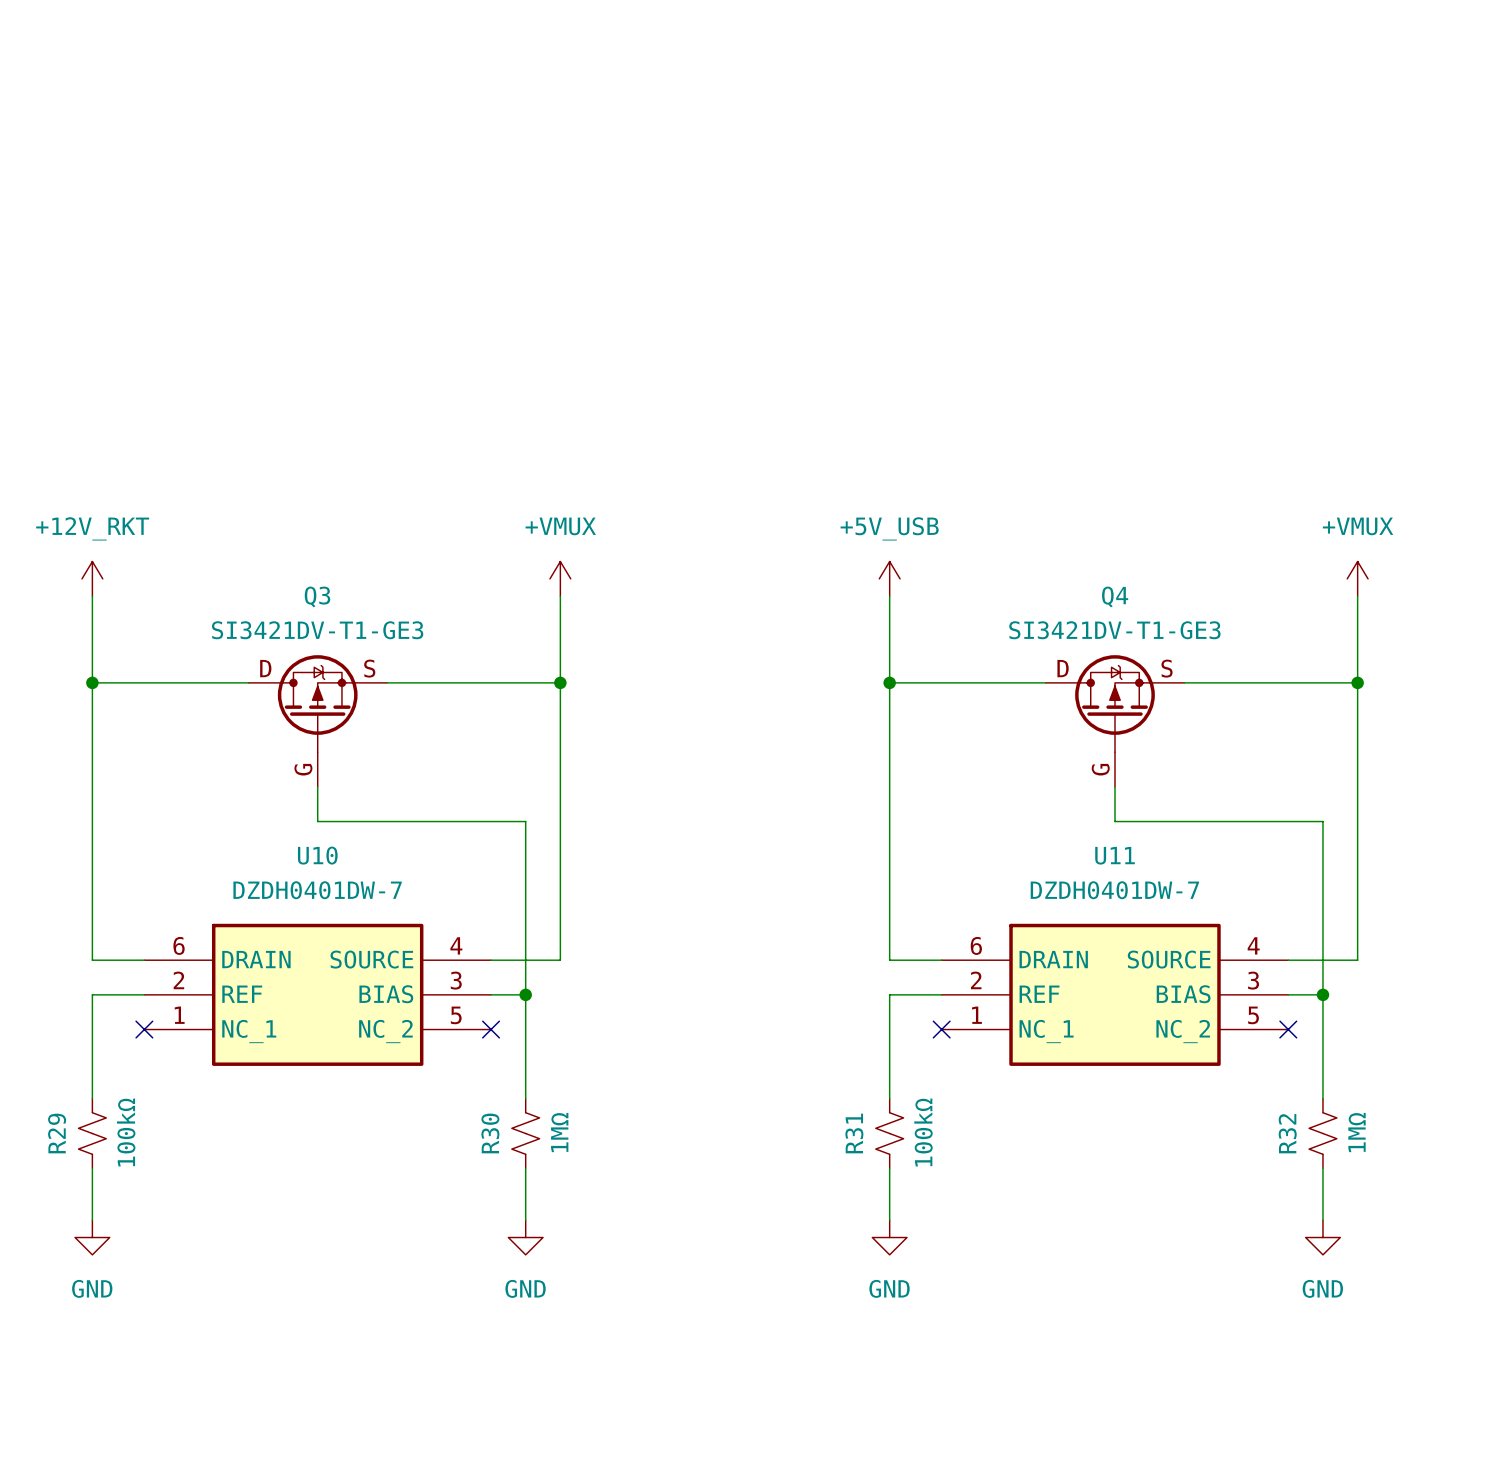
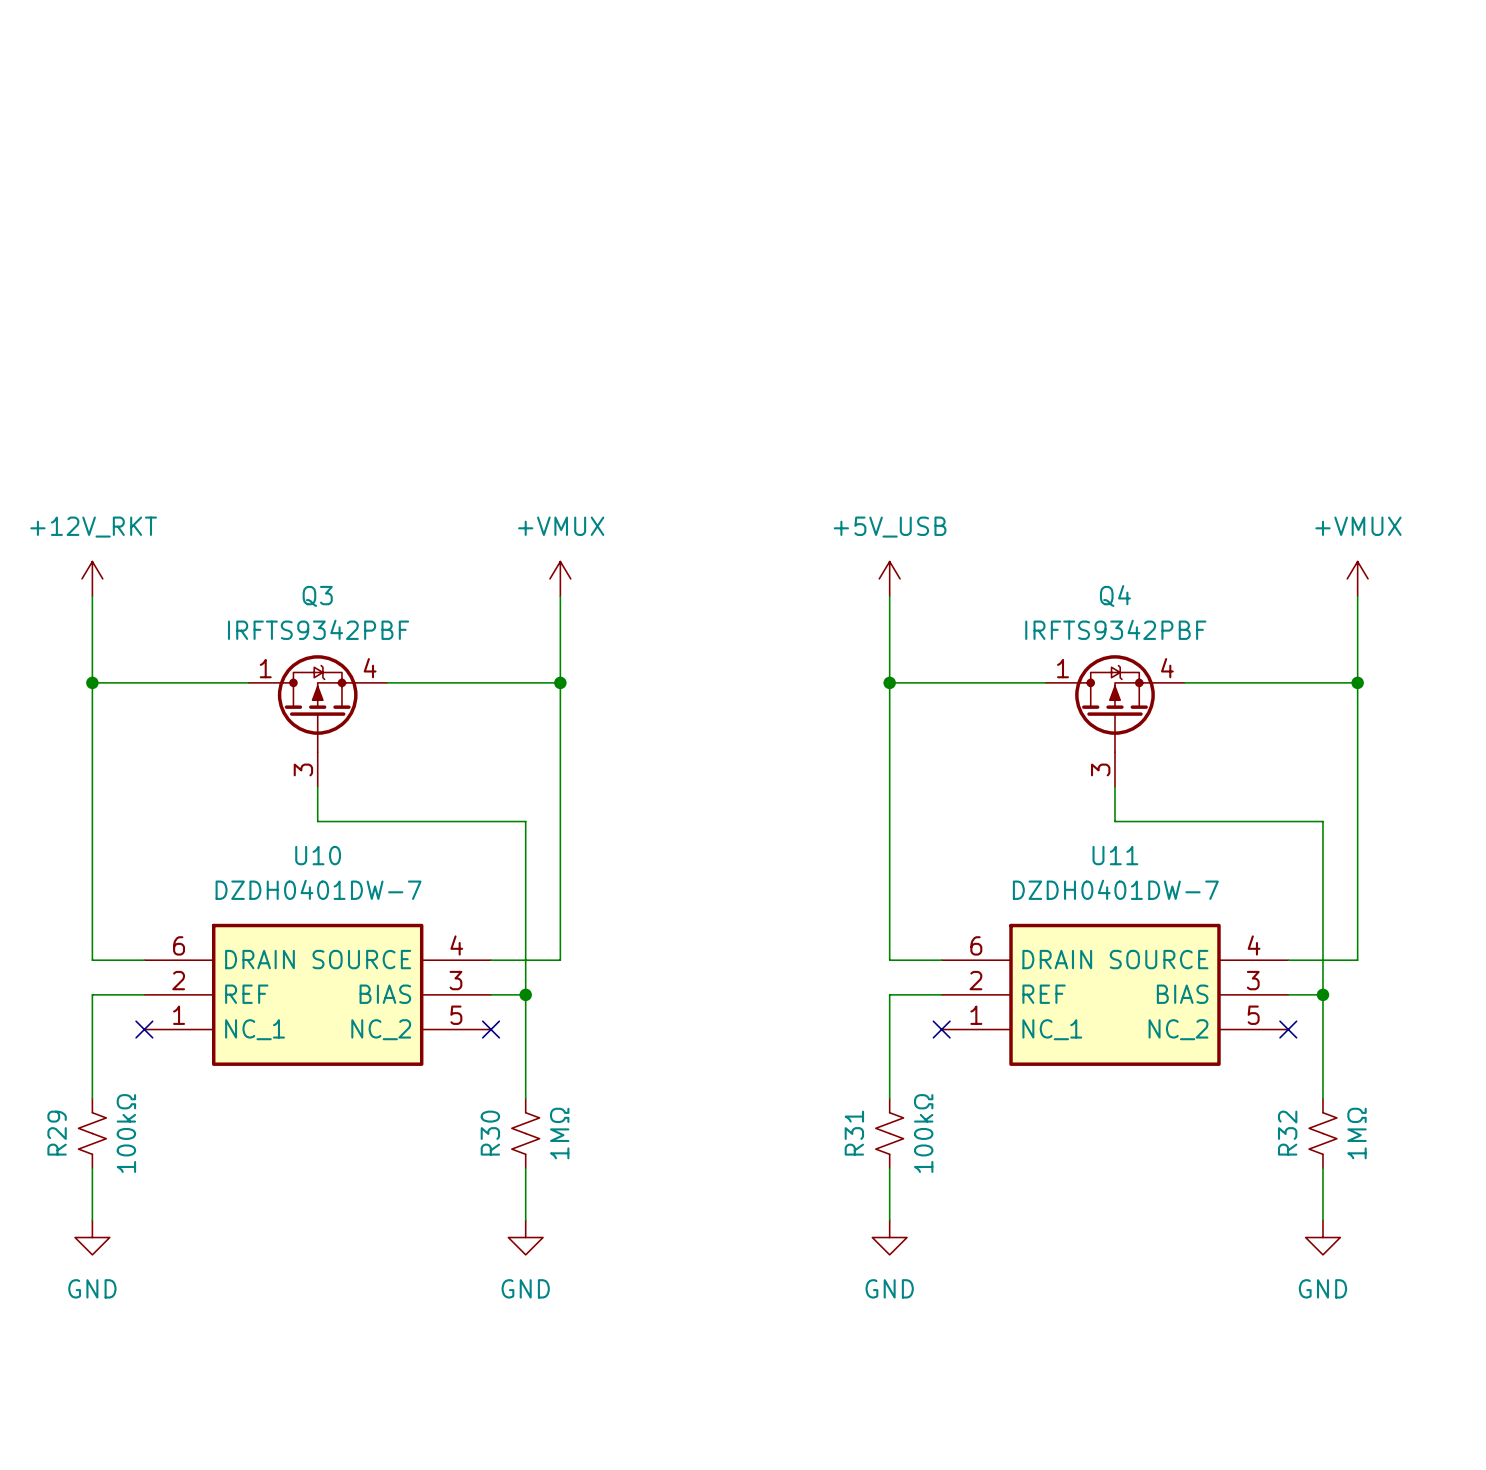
Q3 value: SI3421DV-T1-GE3 (317, 630) -> IRFTS9342PBF (318, 629)
Q4 value: SI3421DV-T1-GE3 (1114, 630) -> IRFTS9342PBF (1115, 629)
Q3 pin number: D (265, 668) -> 1 (265, 668)
Q3 pin number: S (369, 668) -> 4 (370, 668)
Q4 pin number: D (1063, 668) -> 1 (1063, 668)
Q4 pin number: S (1167, 668) -> 4 (1167, 668)
Q3 pin number: G (303, 769) -> 3 (303, 769)
Q4 pin number: G (1100, 769) -> 3 (1100, 769)

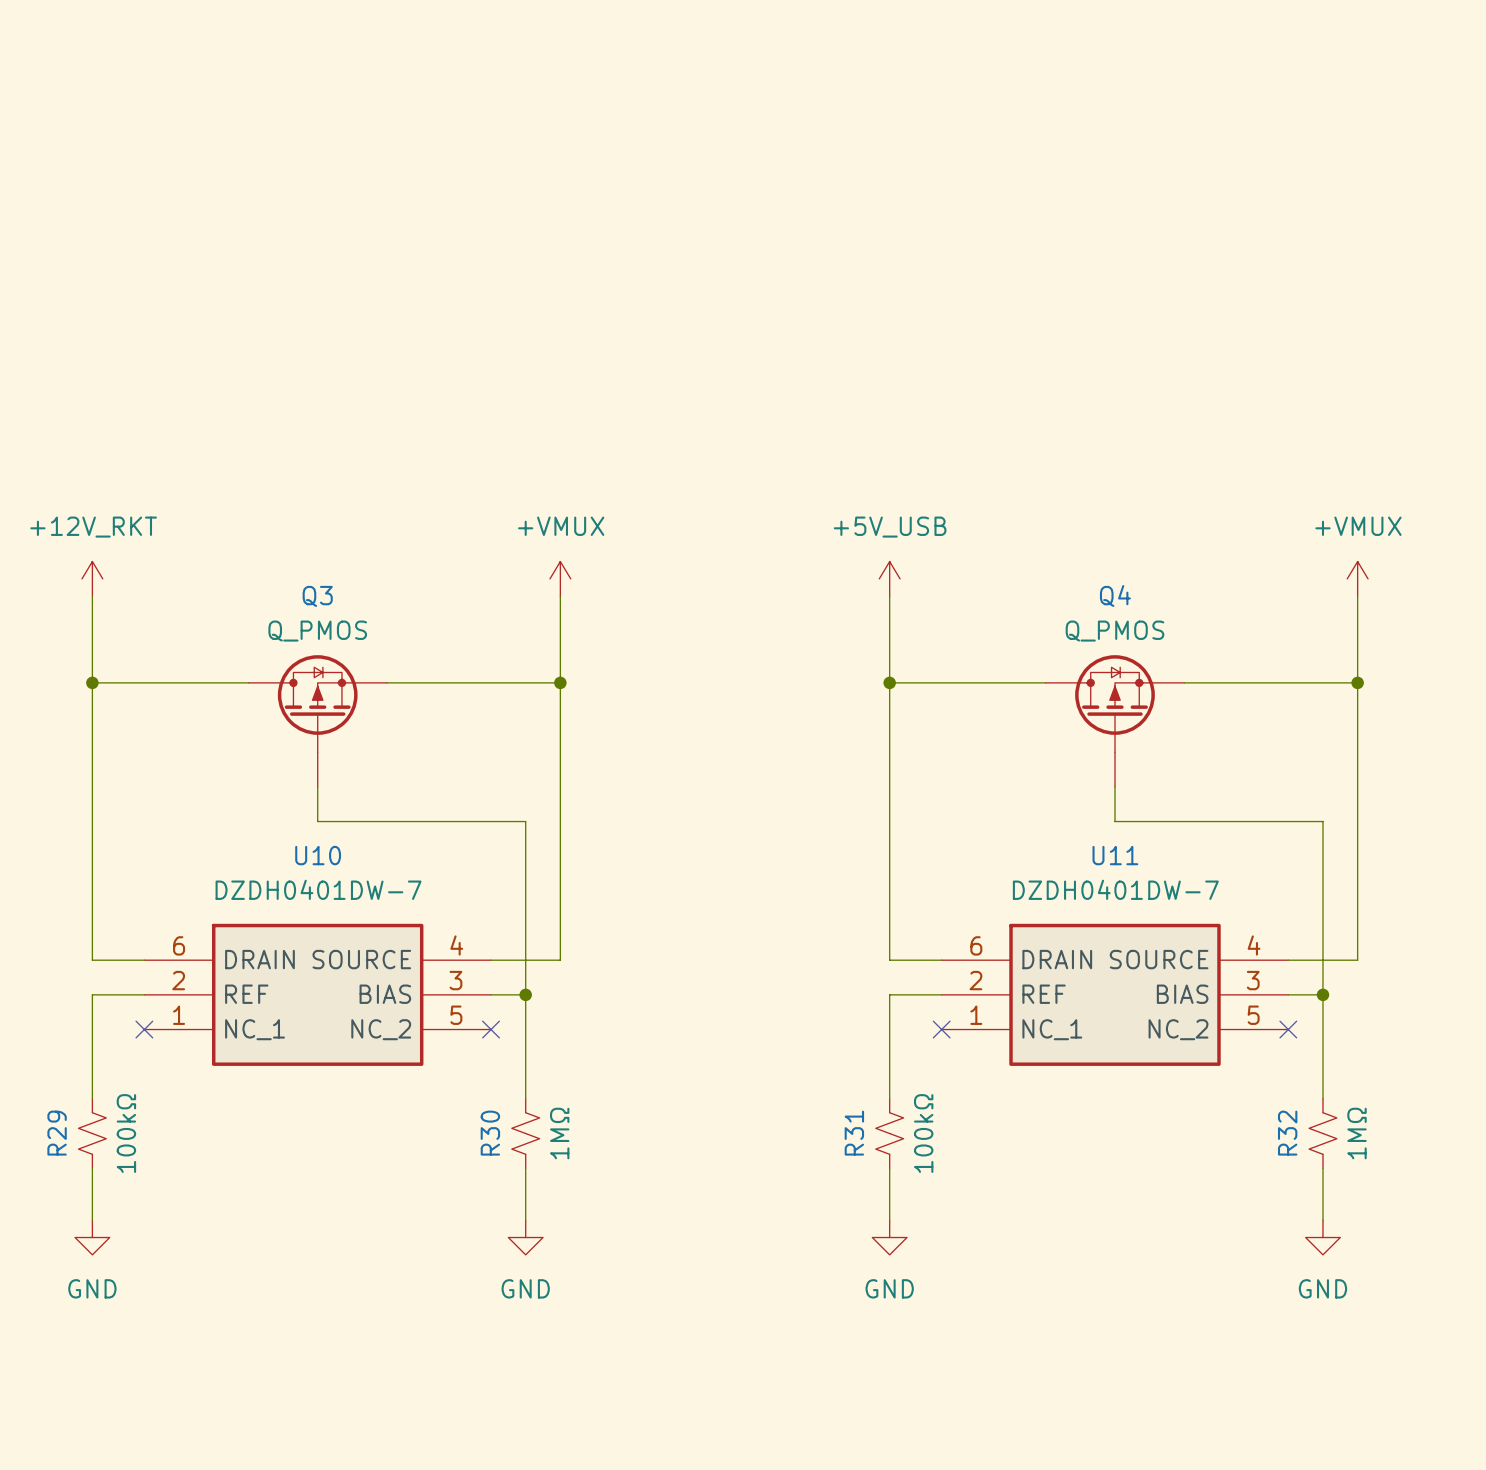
Q3 value: IRFTS9342PBF (318, 629) -> Q_PMOS (317, 631)
Q4 value: IRFTS9342PBF (1115, 629) -> Q_PMOS (1114, 631)
Q3 symbol: [248, 655, 388, 787] -> [248, 655, 388, 787]
Q4 symbol: [1045, 655, 1185, 787] -> [1045, 655, 1185, 787]

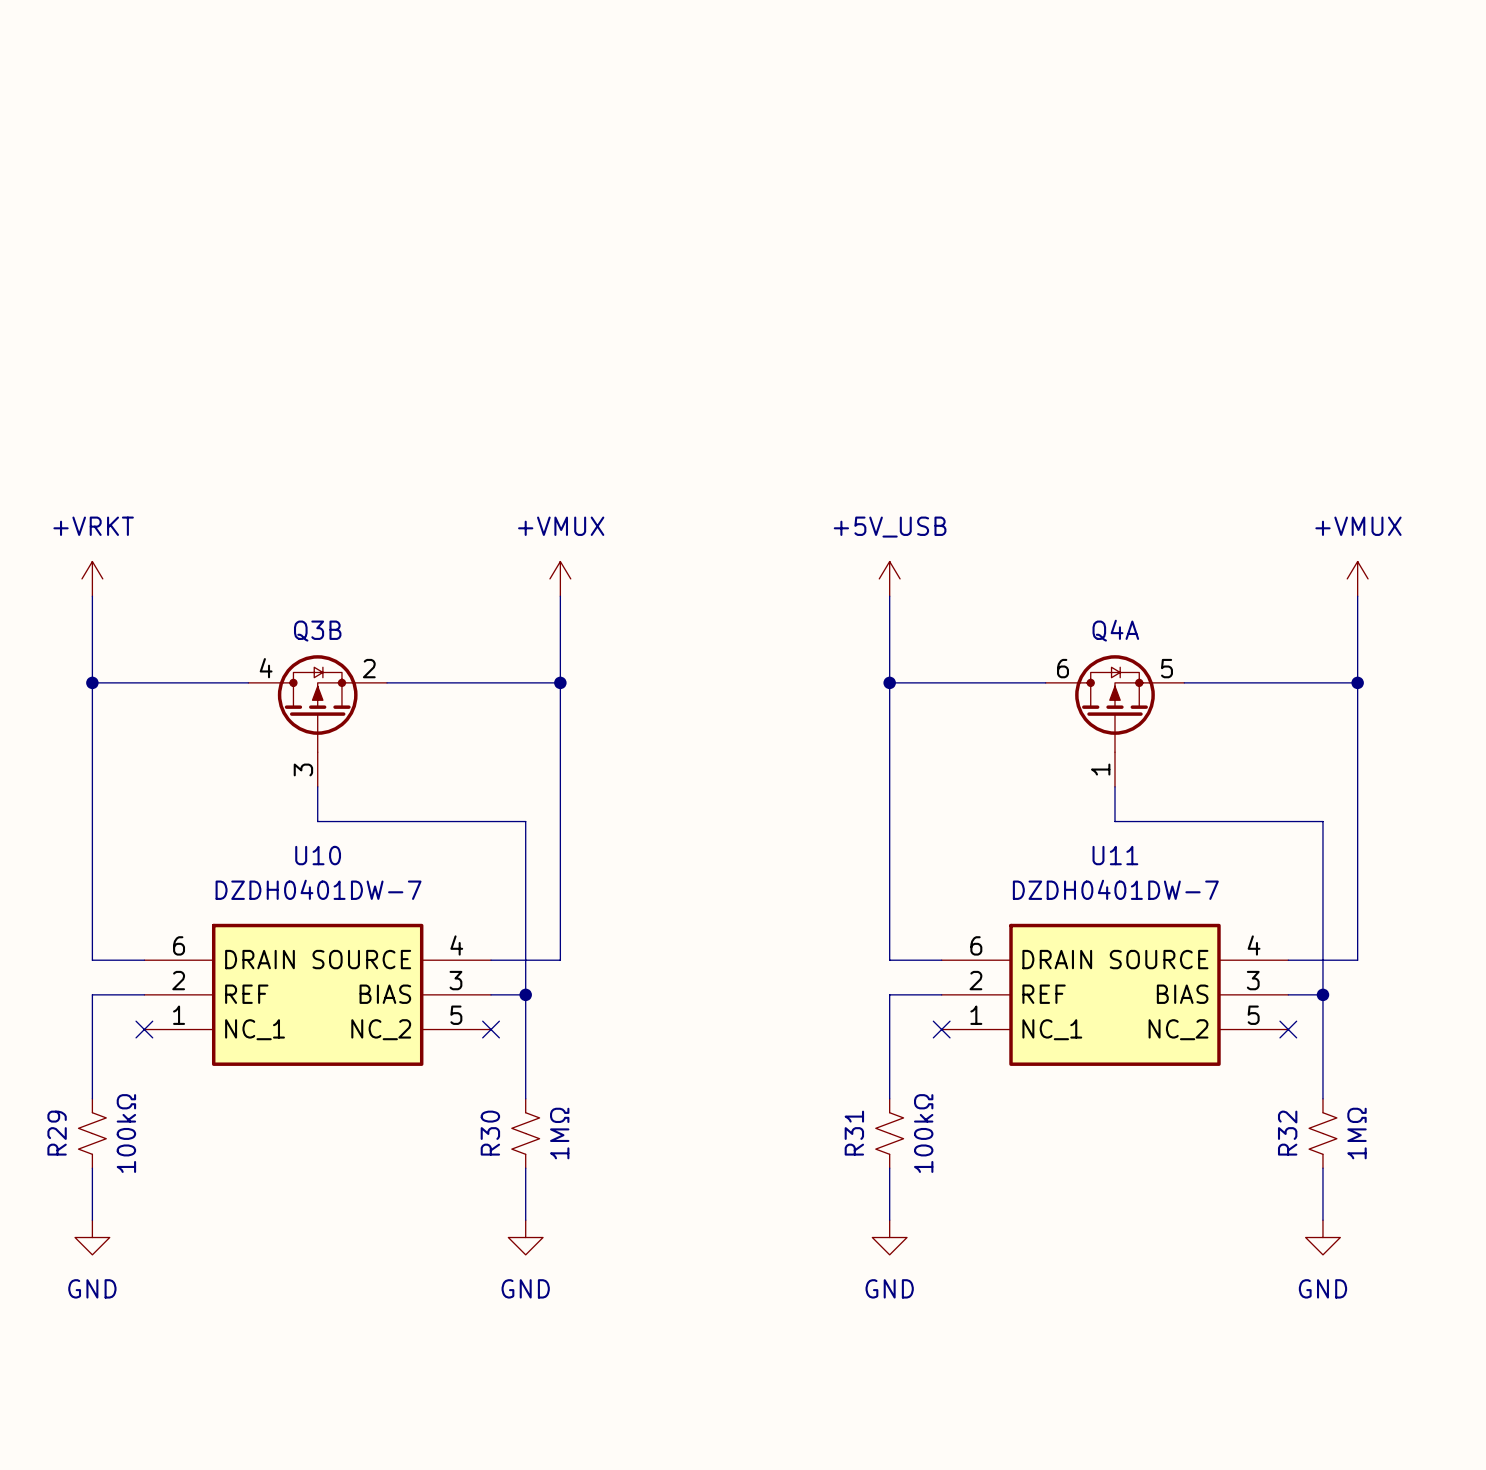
power symbol: +12V_RKT (92, 578) -> +VRKT (92, 578)
Q4 name: Q4 (1115, 595) -> Q4A (1115, 630)
Q3 name: Q3 (317, 596) -> Q3B (317, 631)
Q3 value: Q_PMOS (317, 631) -> none
Q4 value: Q_PMOS (1114, 631) -> none
Q3 pin number: none -> 4 (266, 668)
Q3 pin number: none -> 2 (369, 668)
Q4 pin number: none -> 6 (1063, 668)
Q4 pin number: none -> 5 (1166, 668)
Q3 pin number: none -> 3 (303, 769)
Q4 pin number: none -> 1 (1100, 769)

